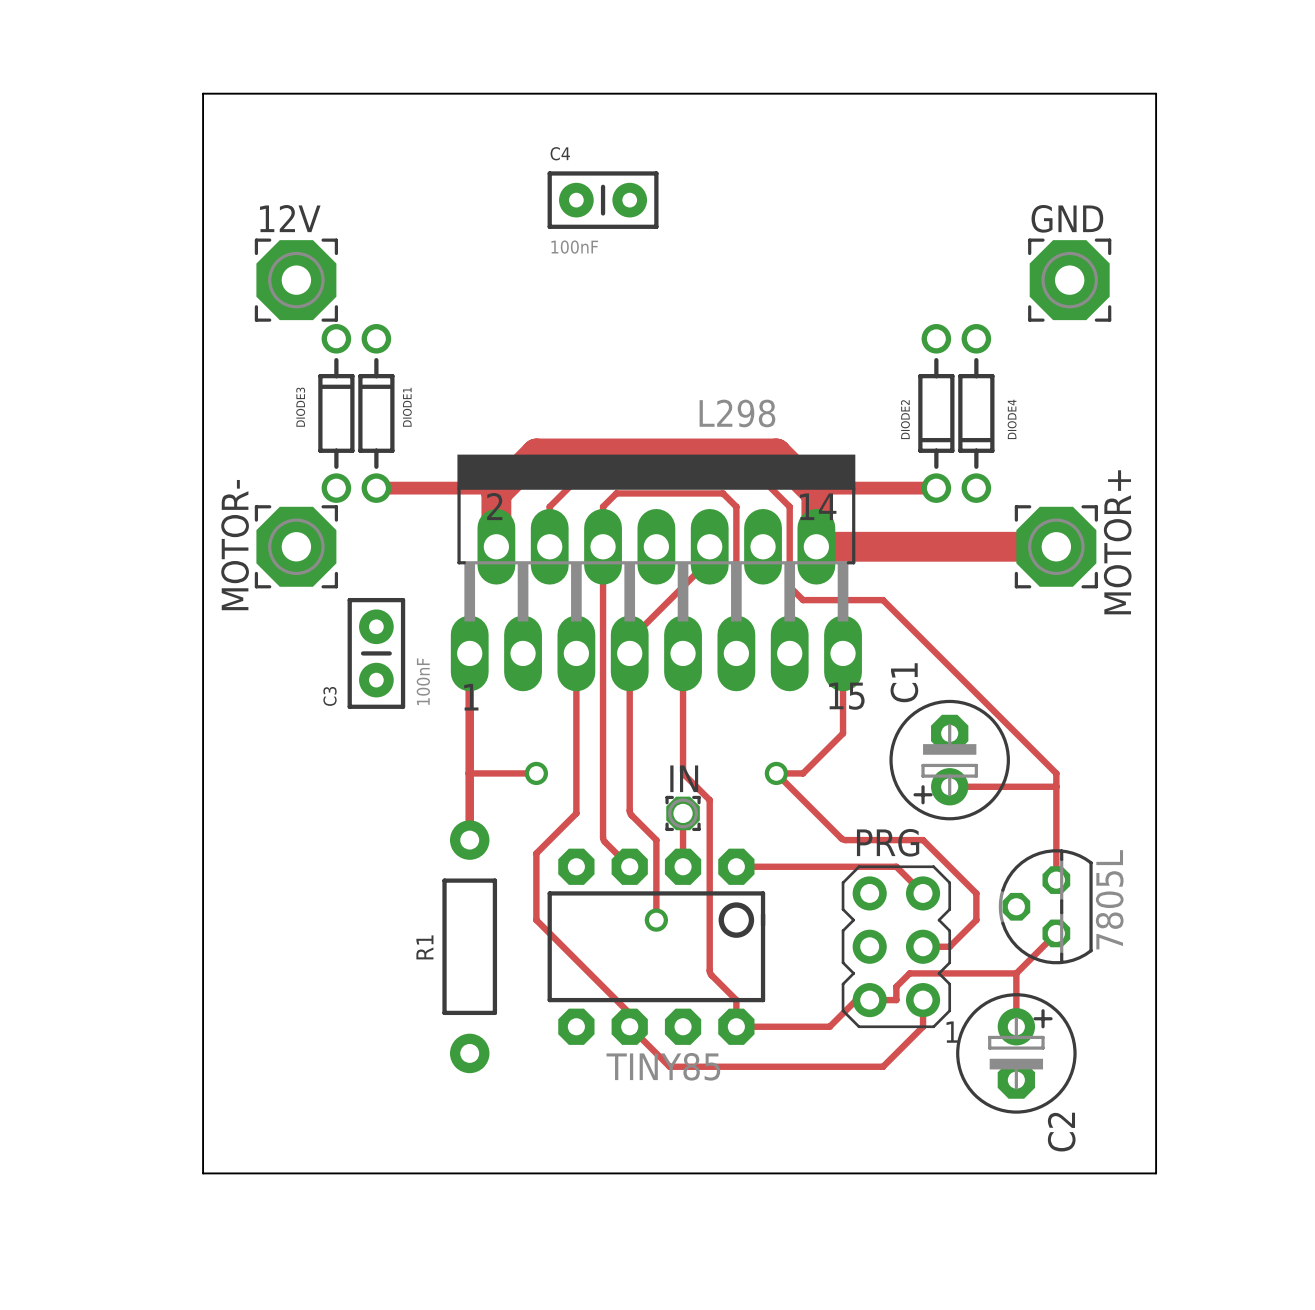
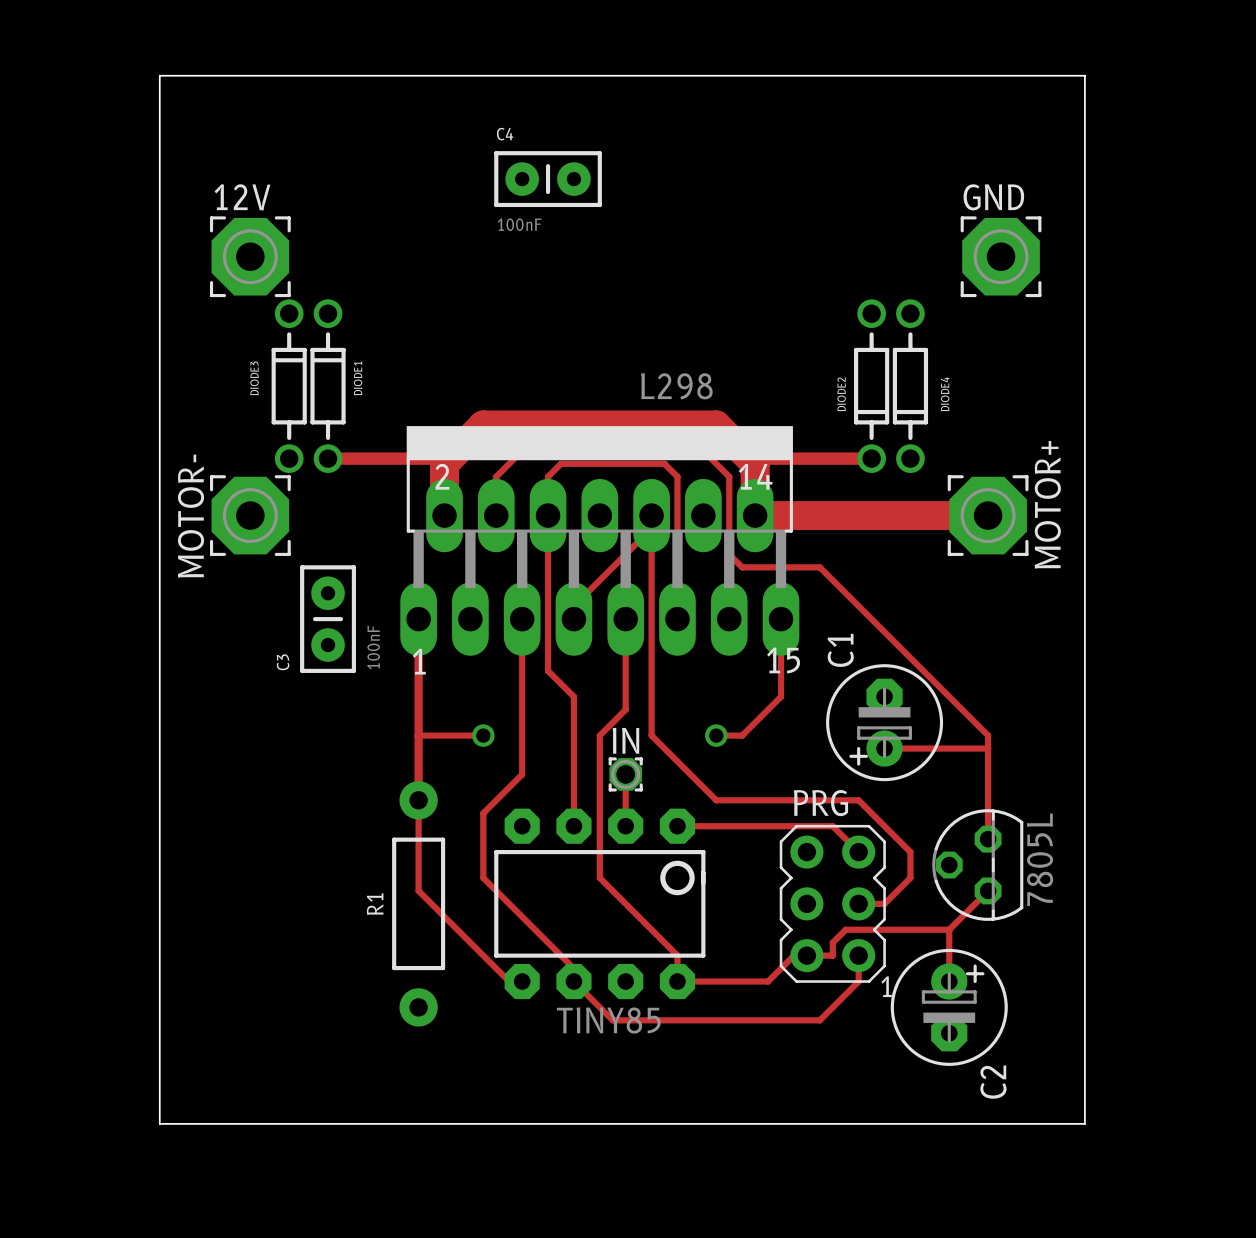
track: (629, 653) (629, 733) -> (548, 670) (573, 696)
track: (603, 706) (603, 838) (629, 866) -> none
track: (683, 746) (683, 774) (709, 800) (709, 970) (711, 975) -> (625, 709) (599, 735) (599, 800)
track: (776, 773) (841, 838) (845, 840) -> (651, 525) (651, 735) (716, 800) (783, 800)
track: (629, 810) (631, 815) (656, 840) -> (573, 771) (573, 826)
track: none -> (418, 800) (418, 890) (509, 981) (522, 981)
track: none -> (599, 877) (653, 931)
via: (656, 920) -> none

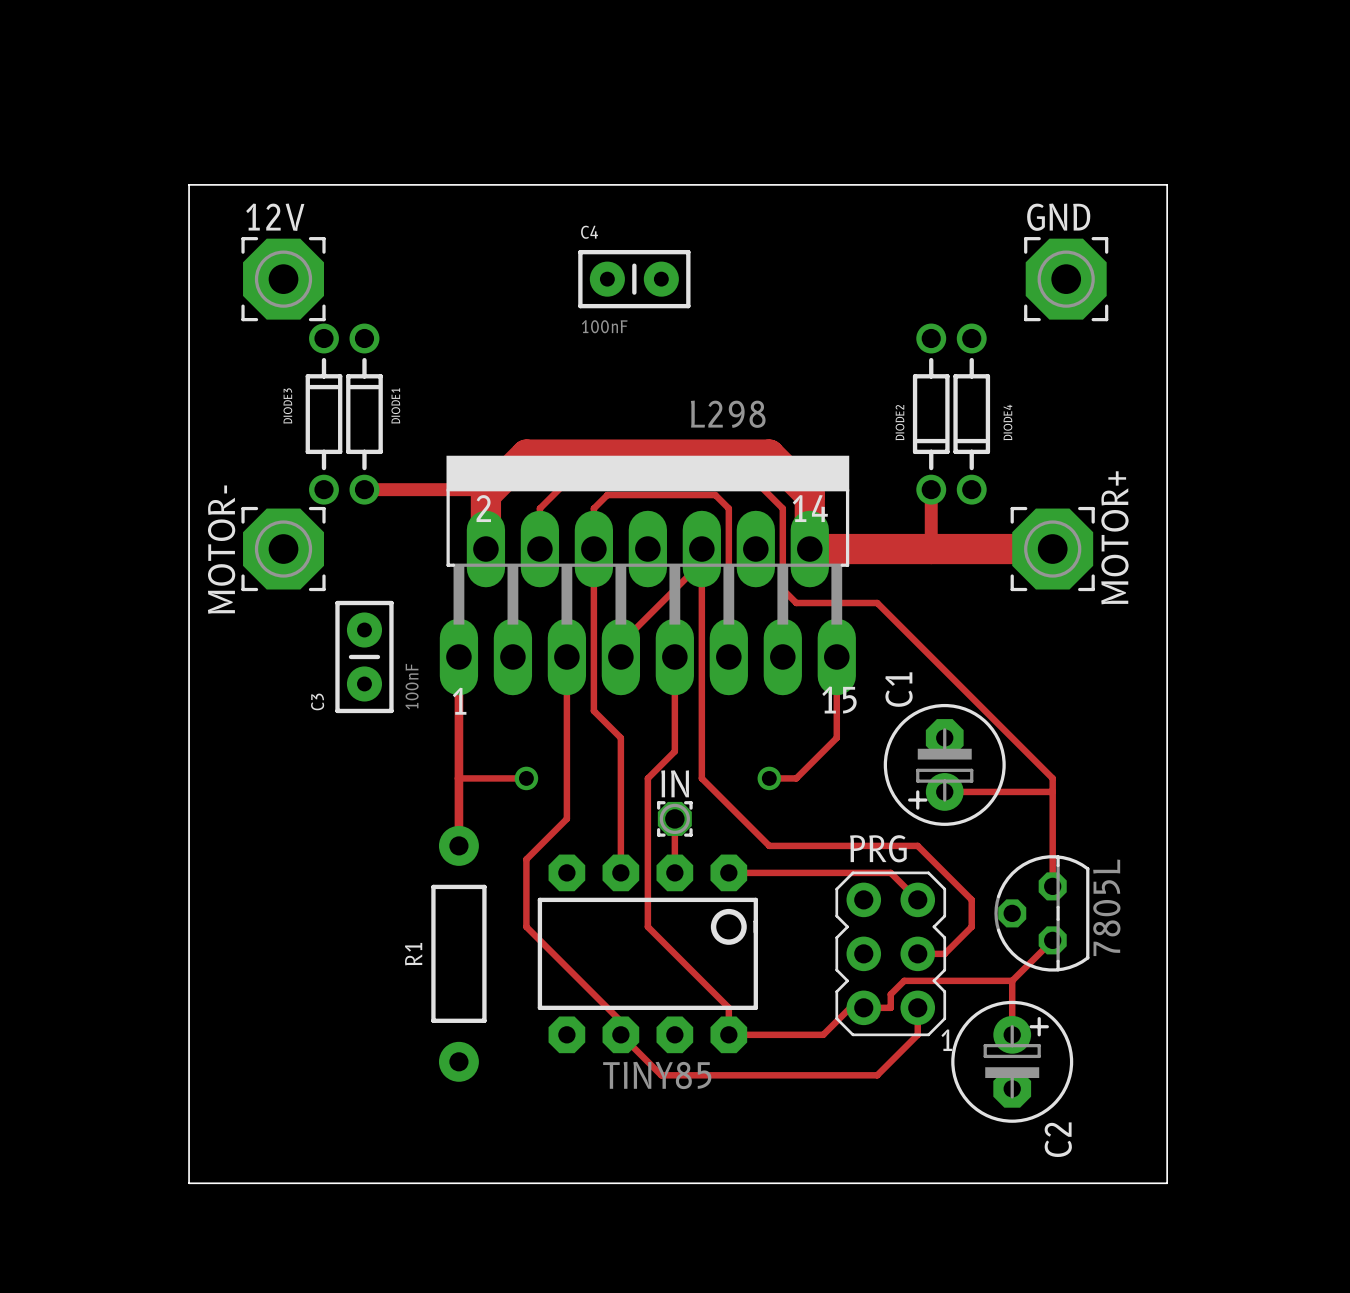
board edge: (159, 166) (159, 75) (1084, 75) (1084, 1123) -> (189, 184) (1167, 184) (1167, 1183) (1153, 1183)
C4 position: (548, 179) -> (634, 279)
track: (760, 458) (871, 458) -> (931, 549) (931, 489)
track: (418, 800) (418, 890) (509, 981) (522, 981) -> none

